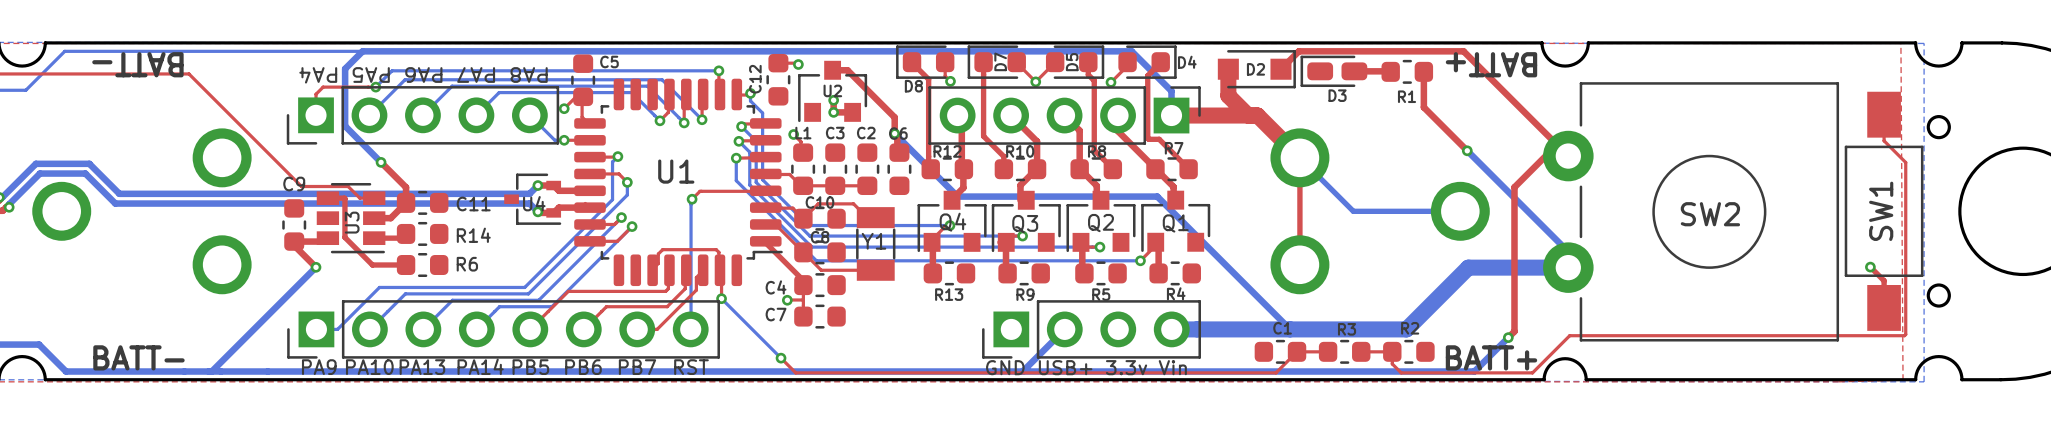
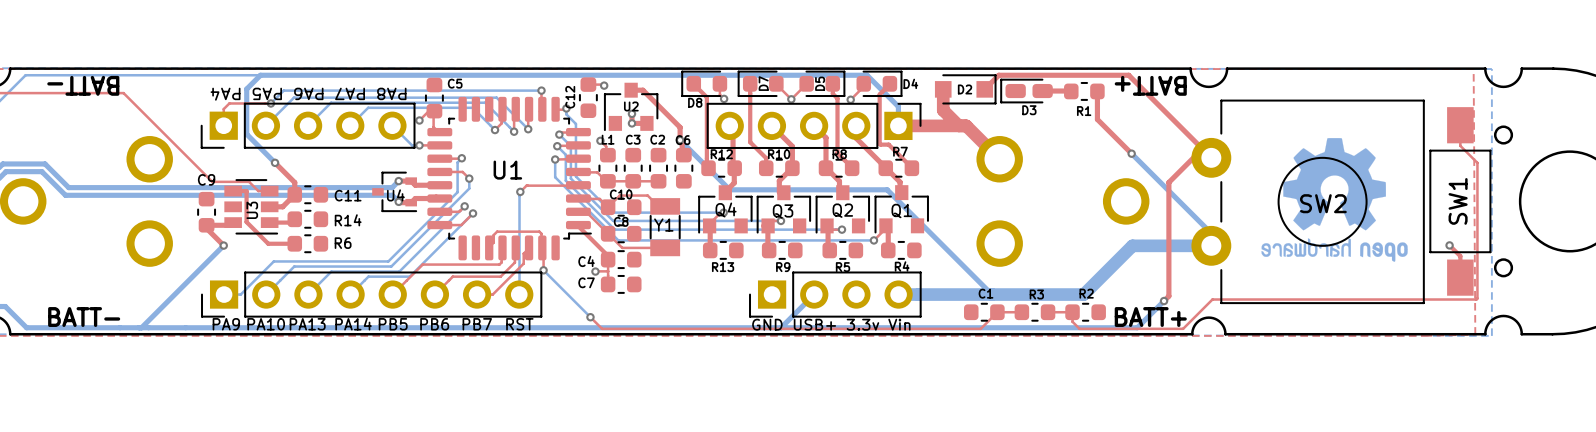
drawing: none -> [1261, 138, 1408, 262]
bottom track: (1299, 157) (1353, 211) (1460, 211) -> none
top track: (1299, 157) (1299, 264) -> none

